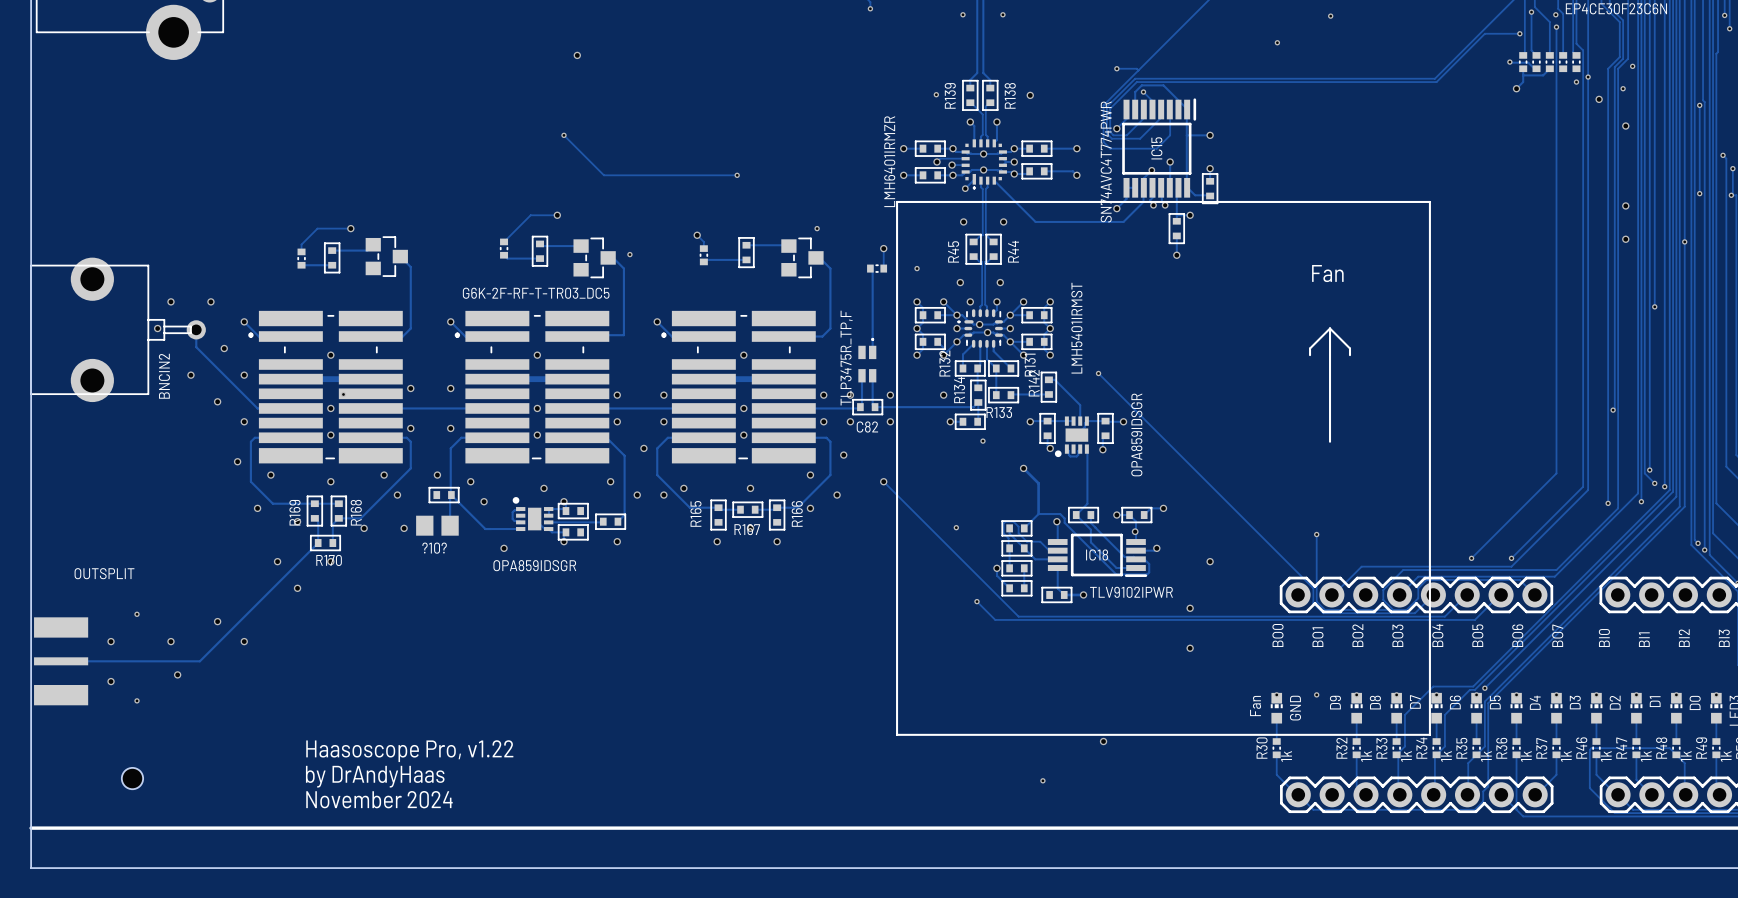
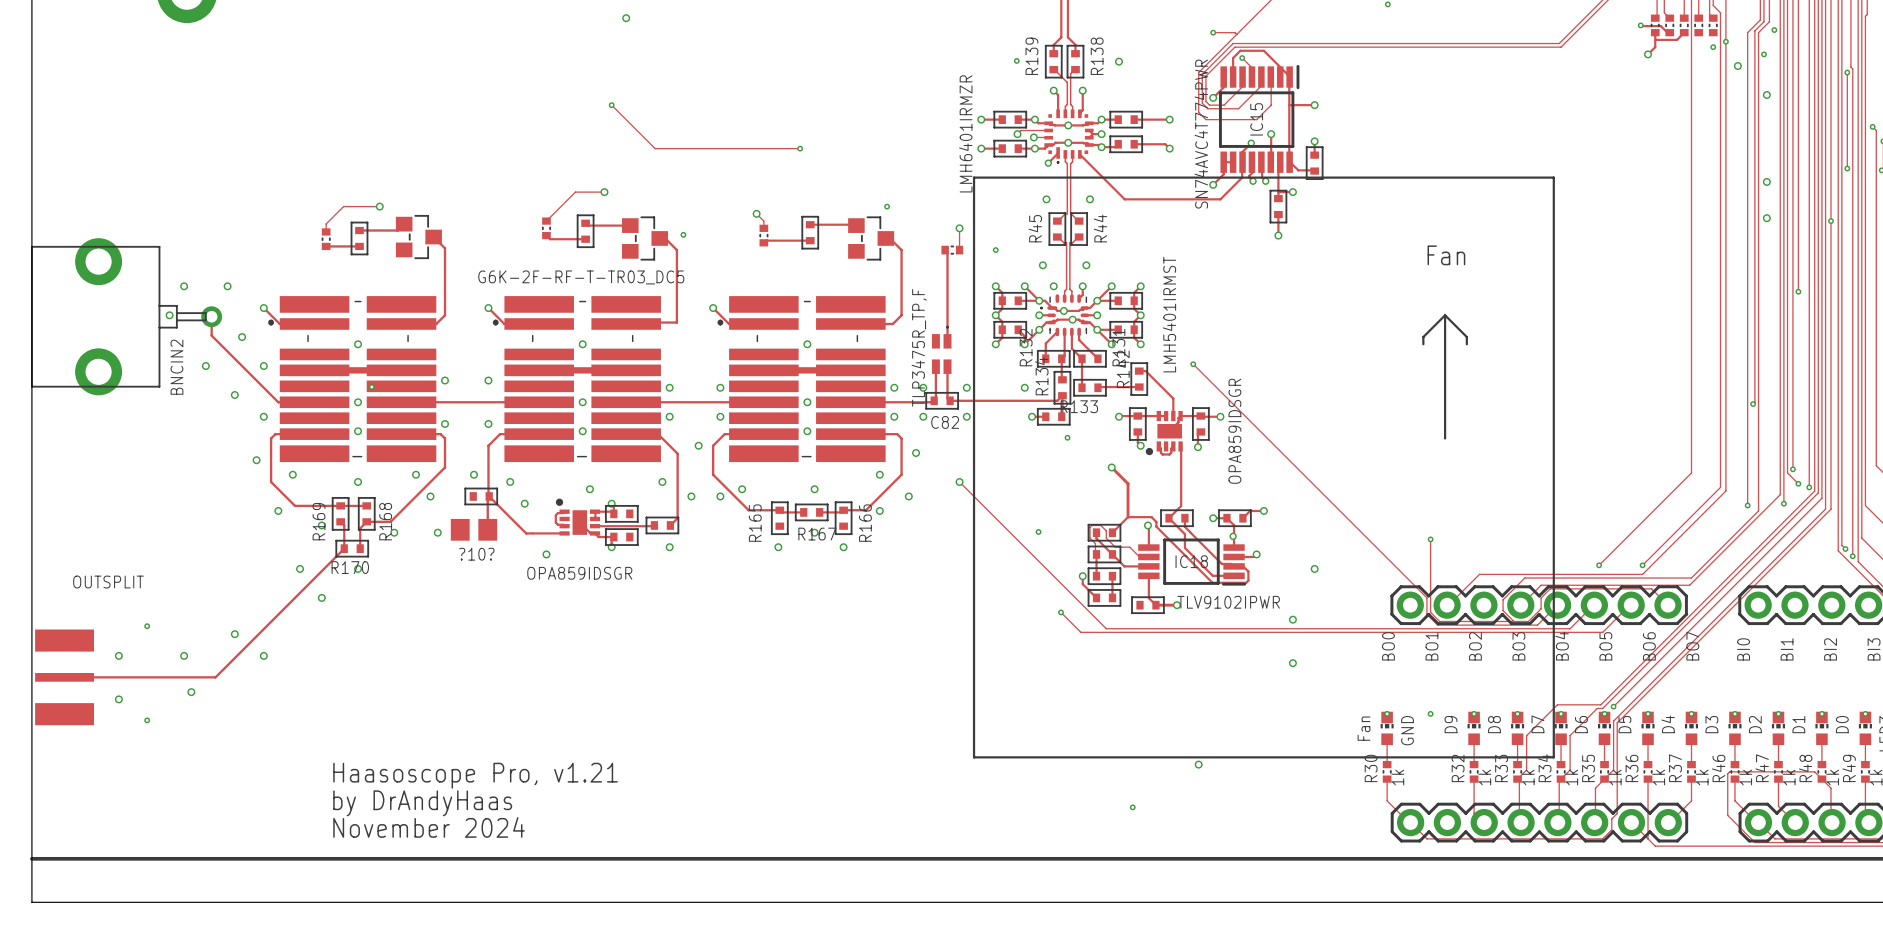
text: Haasoscope Pro, v1.22 (409, 751) -> Haasoscope Pro, v1.21 (475, 775)
hole: (132, 778) -> none

